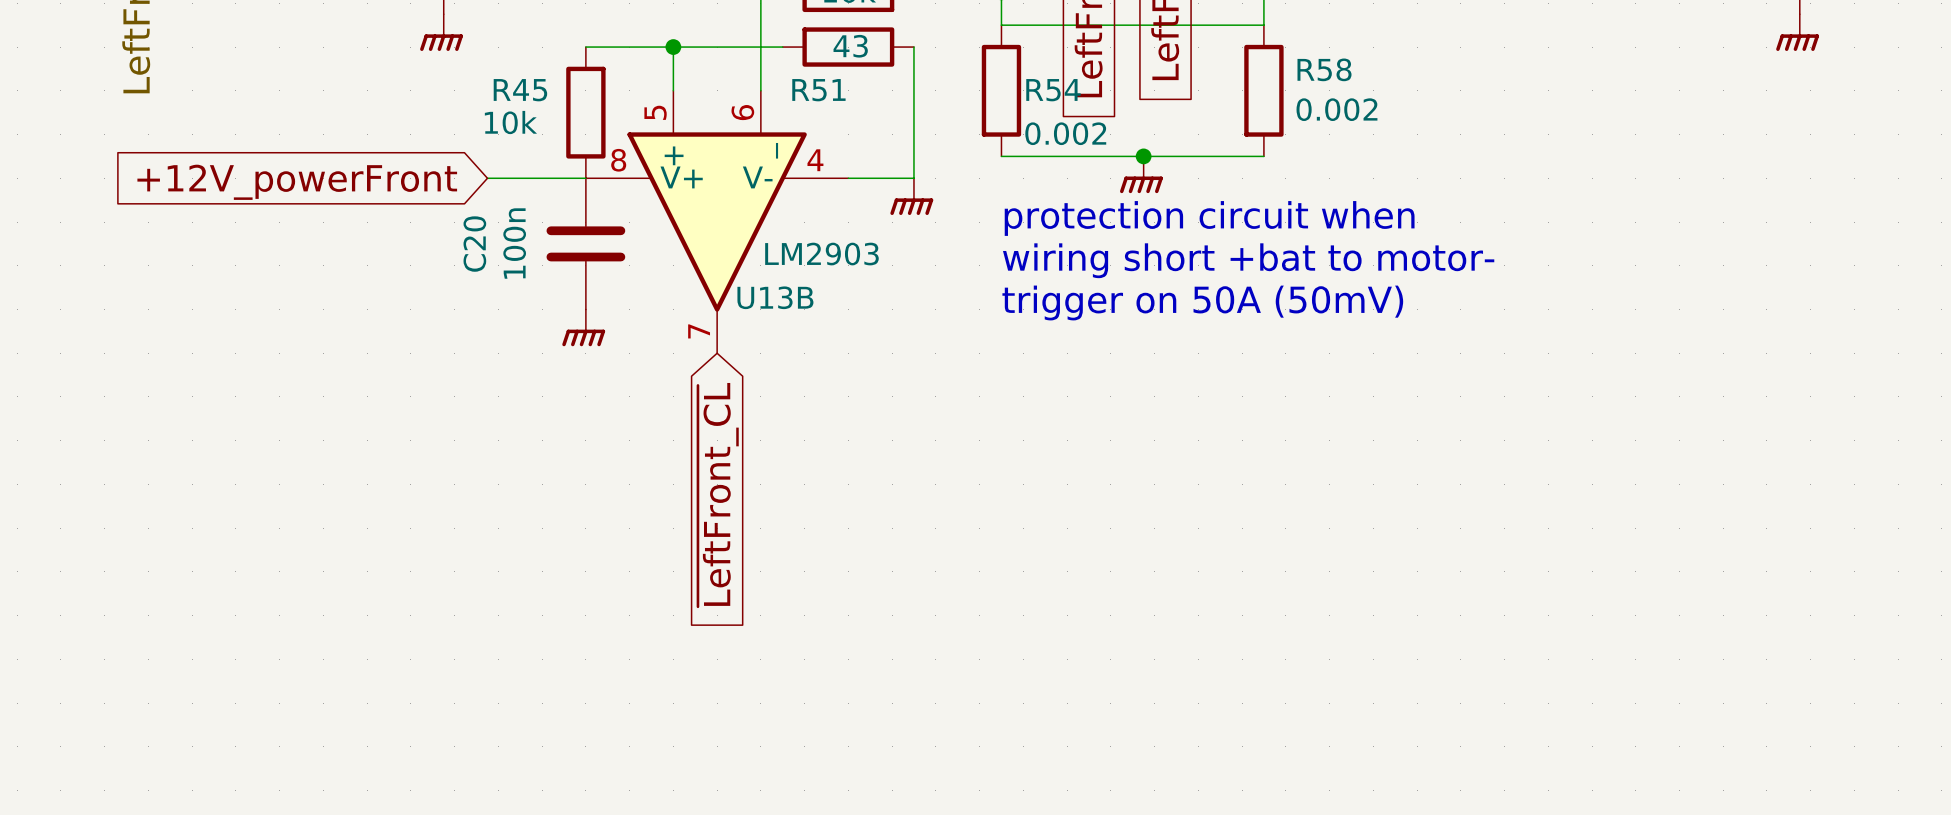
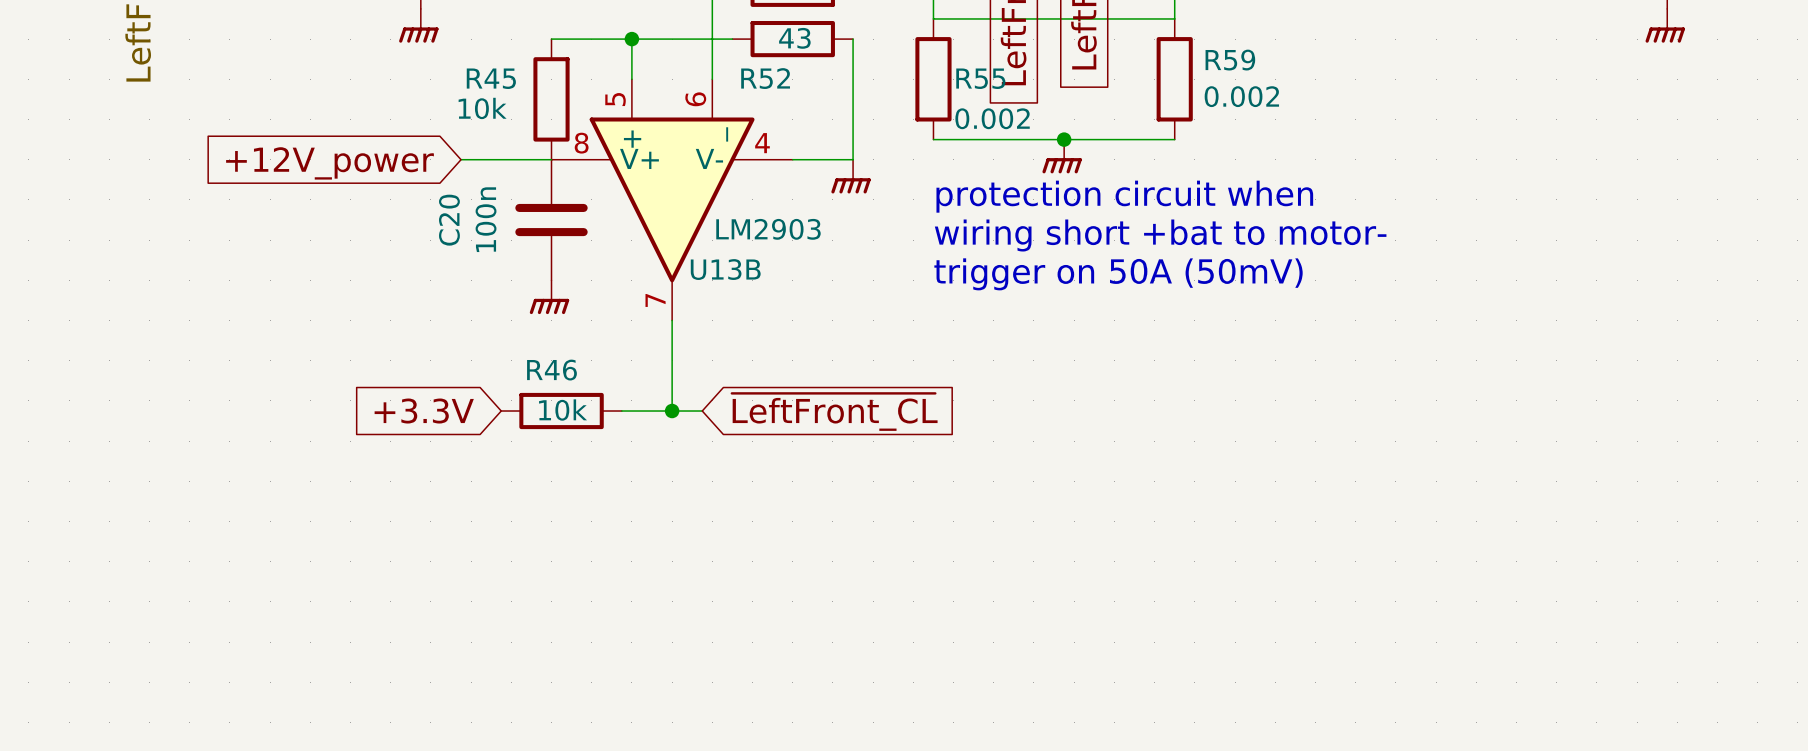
R58 name: R58 (1324, 69) -> R59 (1230, 60)
R51 name: R51 (818, 90) -> R52 (765, 78)
R54 name: R54 (1053, 90) -> R55 (980, 78)
global label: +12V_powerFront (297, 182) -> +12V_power (330, 163)
wire: none -> (672, 320) (672, 411)
global label: none -> +3.3V (424, 411)
R46: none -> 10k (561, 411)
wire: none -> (621, 411) (702, 411)
junction: none -> (672, 411)
global label rotation: 0° (718, 494) -> 90° counterclockwise (834, 412)

